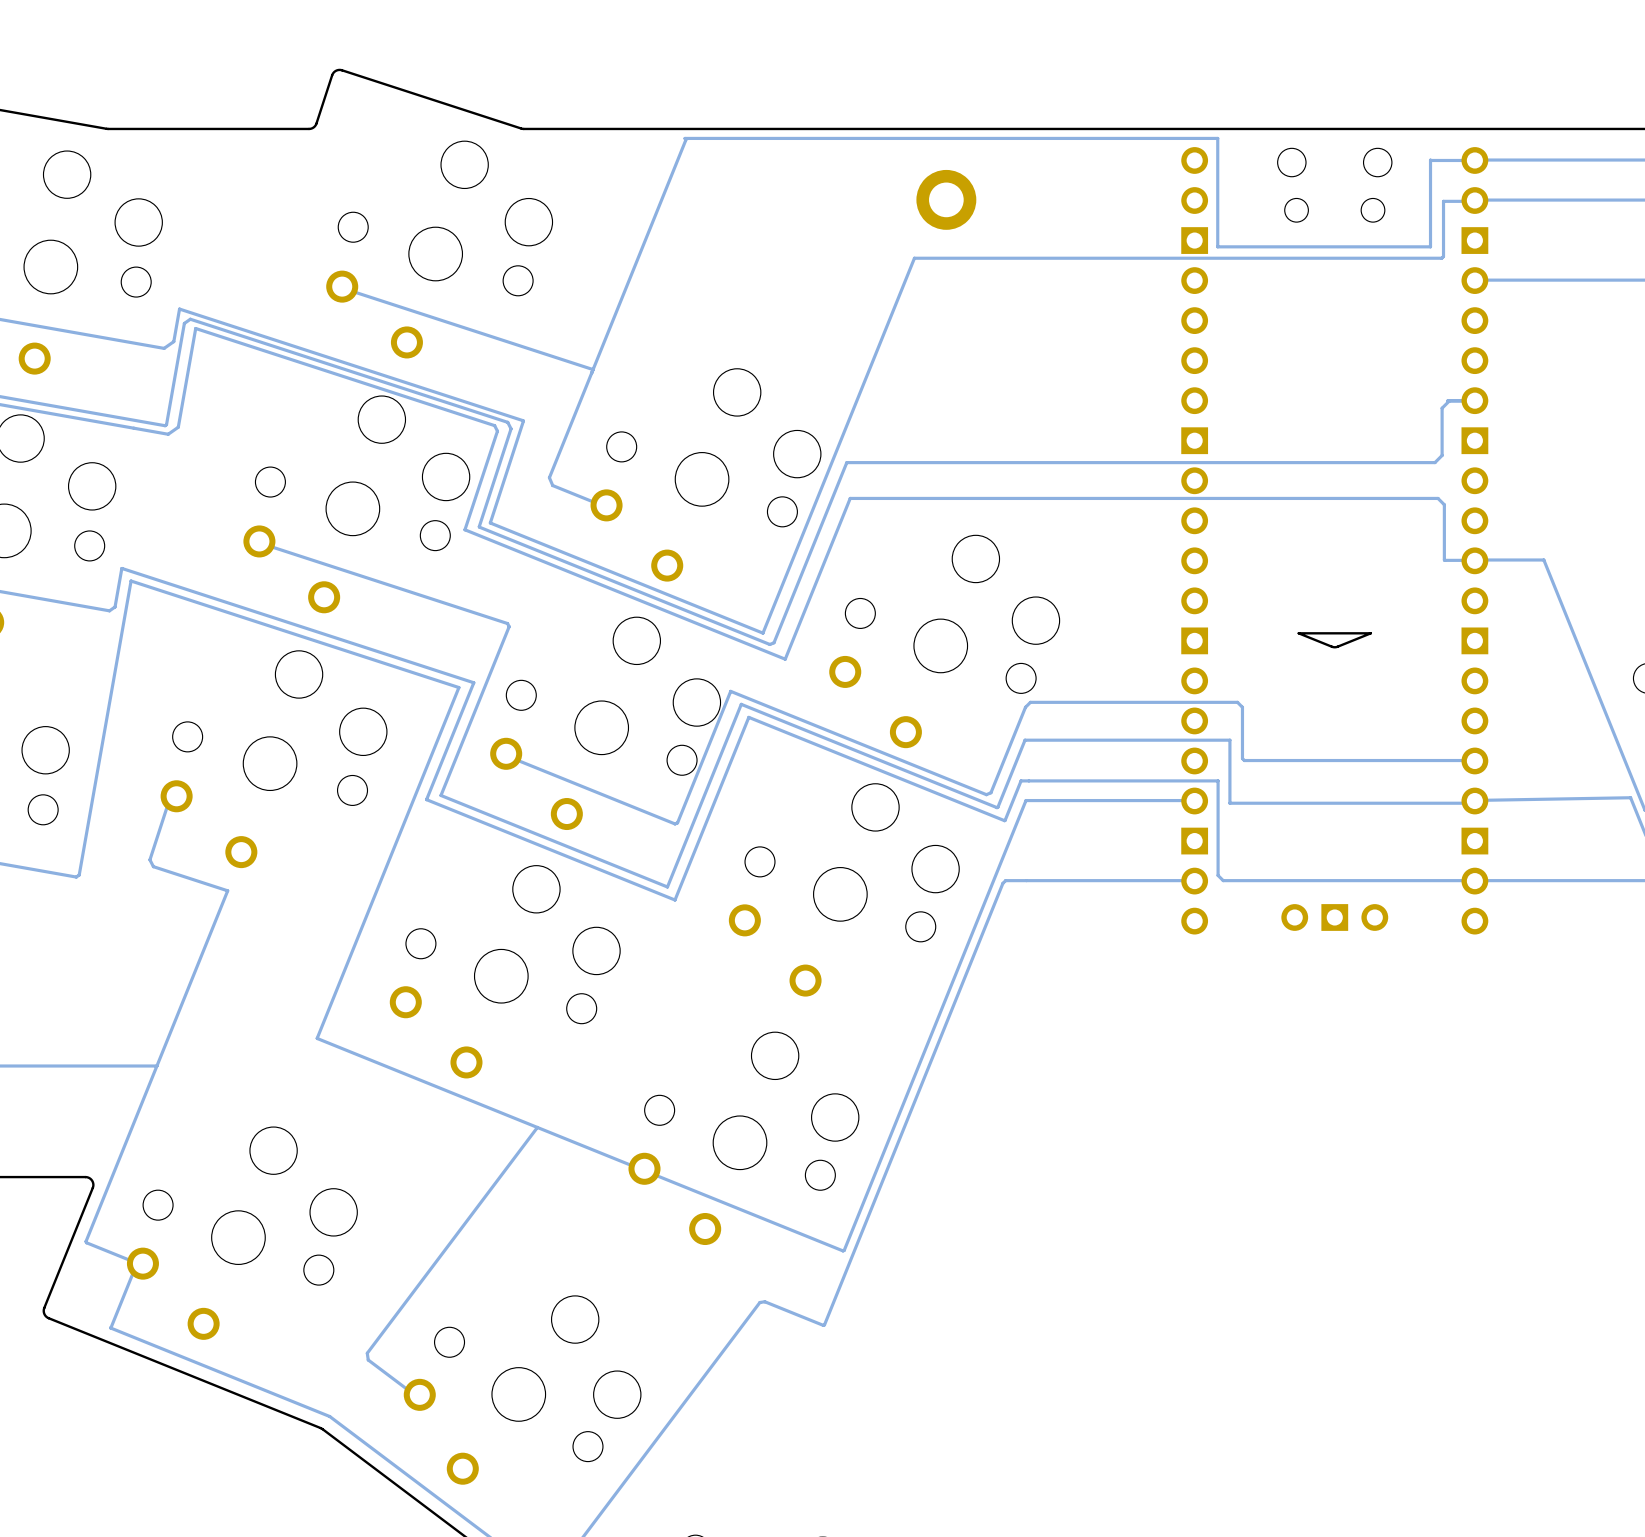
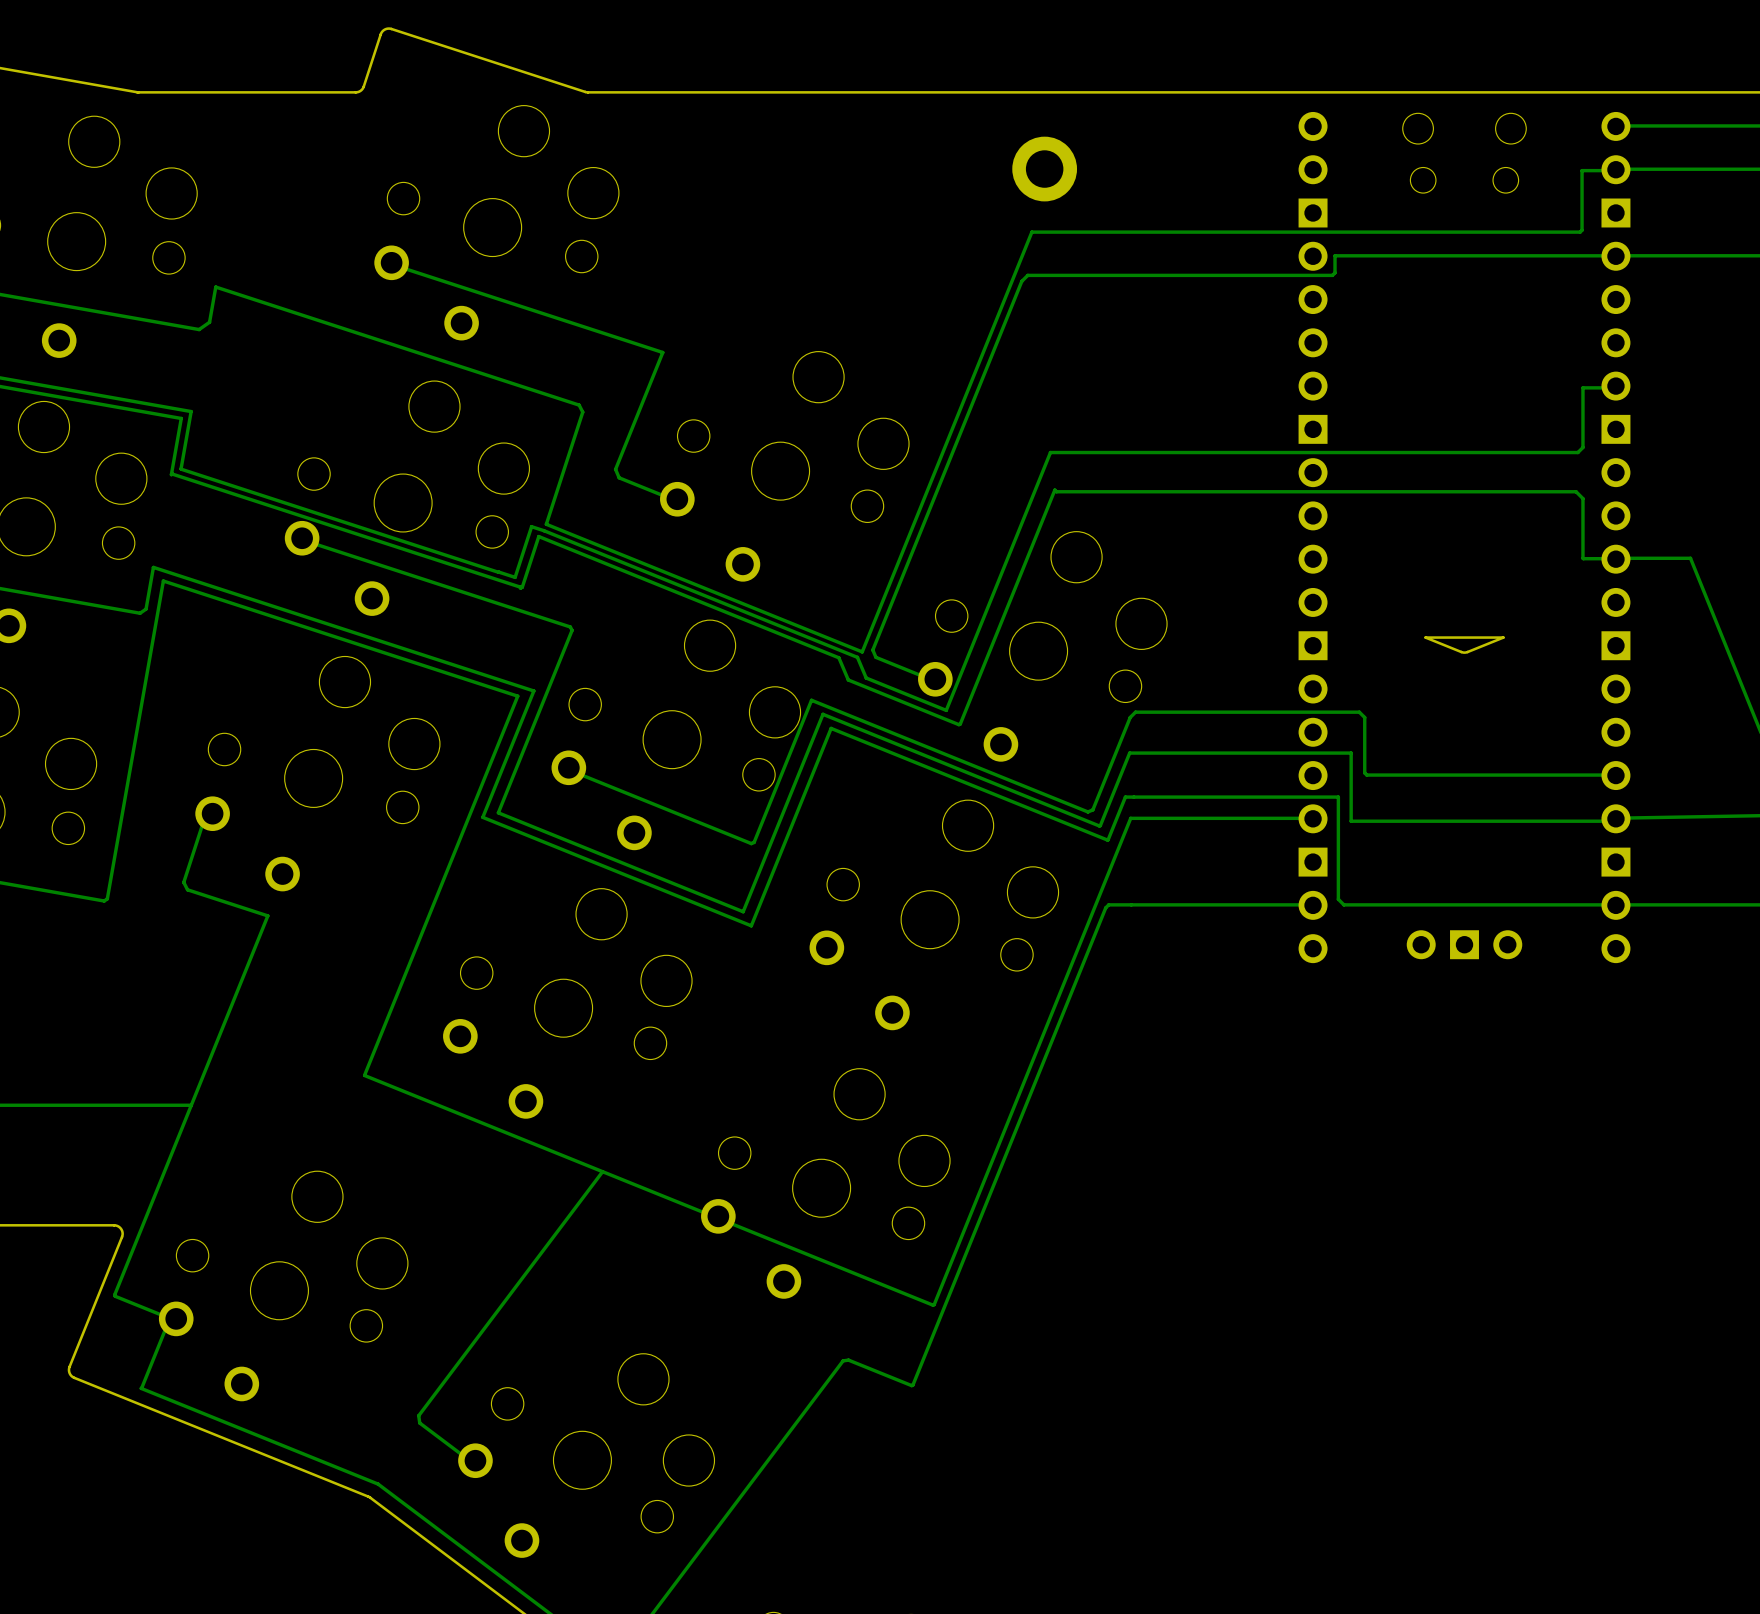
track: (1474, 160) (1430, 160) (1430, 246) (1217, 246) (1217, 138) (685, 138) (591, 372) -> none
track: (934, 258) (914, 258) (762, 633) (490, 522) (523, 421) (515, 418) -> (1031, 232) (862, 651) (546, 524) (582, 412) (579, 405)
track: none -> (1609, 255) (1335, 255) (1335, 272) (1332, 275) (1027, 275) (1021, 281) (872, 650) (875, 657) (929, 678)
track: (1449, 400) (1442, 408) (1442, 455) (1435, 462) (846, 462) (774, 642) (769, 644) (479, 527) (511, 428) (507, 422) (190, 319) (184, 323) (166, 424) (156, 424) -> (1609, 385) (1607, 387) (1582, 387) (1582, 447) (1577, 452) (1050, 452) (946, 710) (866, 678) (857, 657) (531, 526) (515, 577) (181, 469) (191, 411)
track: (133, 428) (168, 434) (178, 427) (195, 328) (494, 425) (497, 431) (464, 529) (785, 659) (850, 498) (957, 498) -> (166, 415) (181, 418) (171, 474) (520, 588) (538, 536) (838, 657) (848, 679) (958, 724) (1054, 490) (1056, 491)

